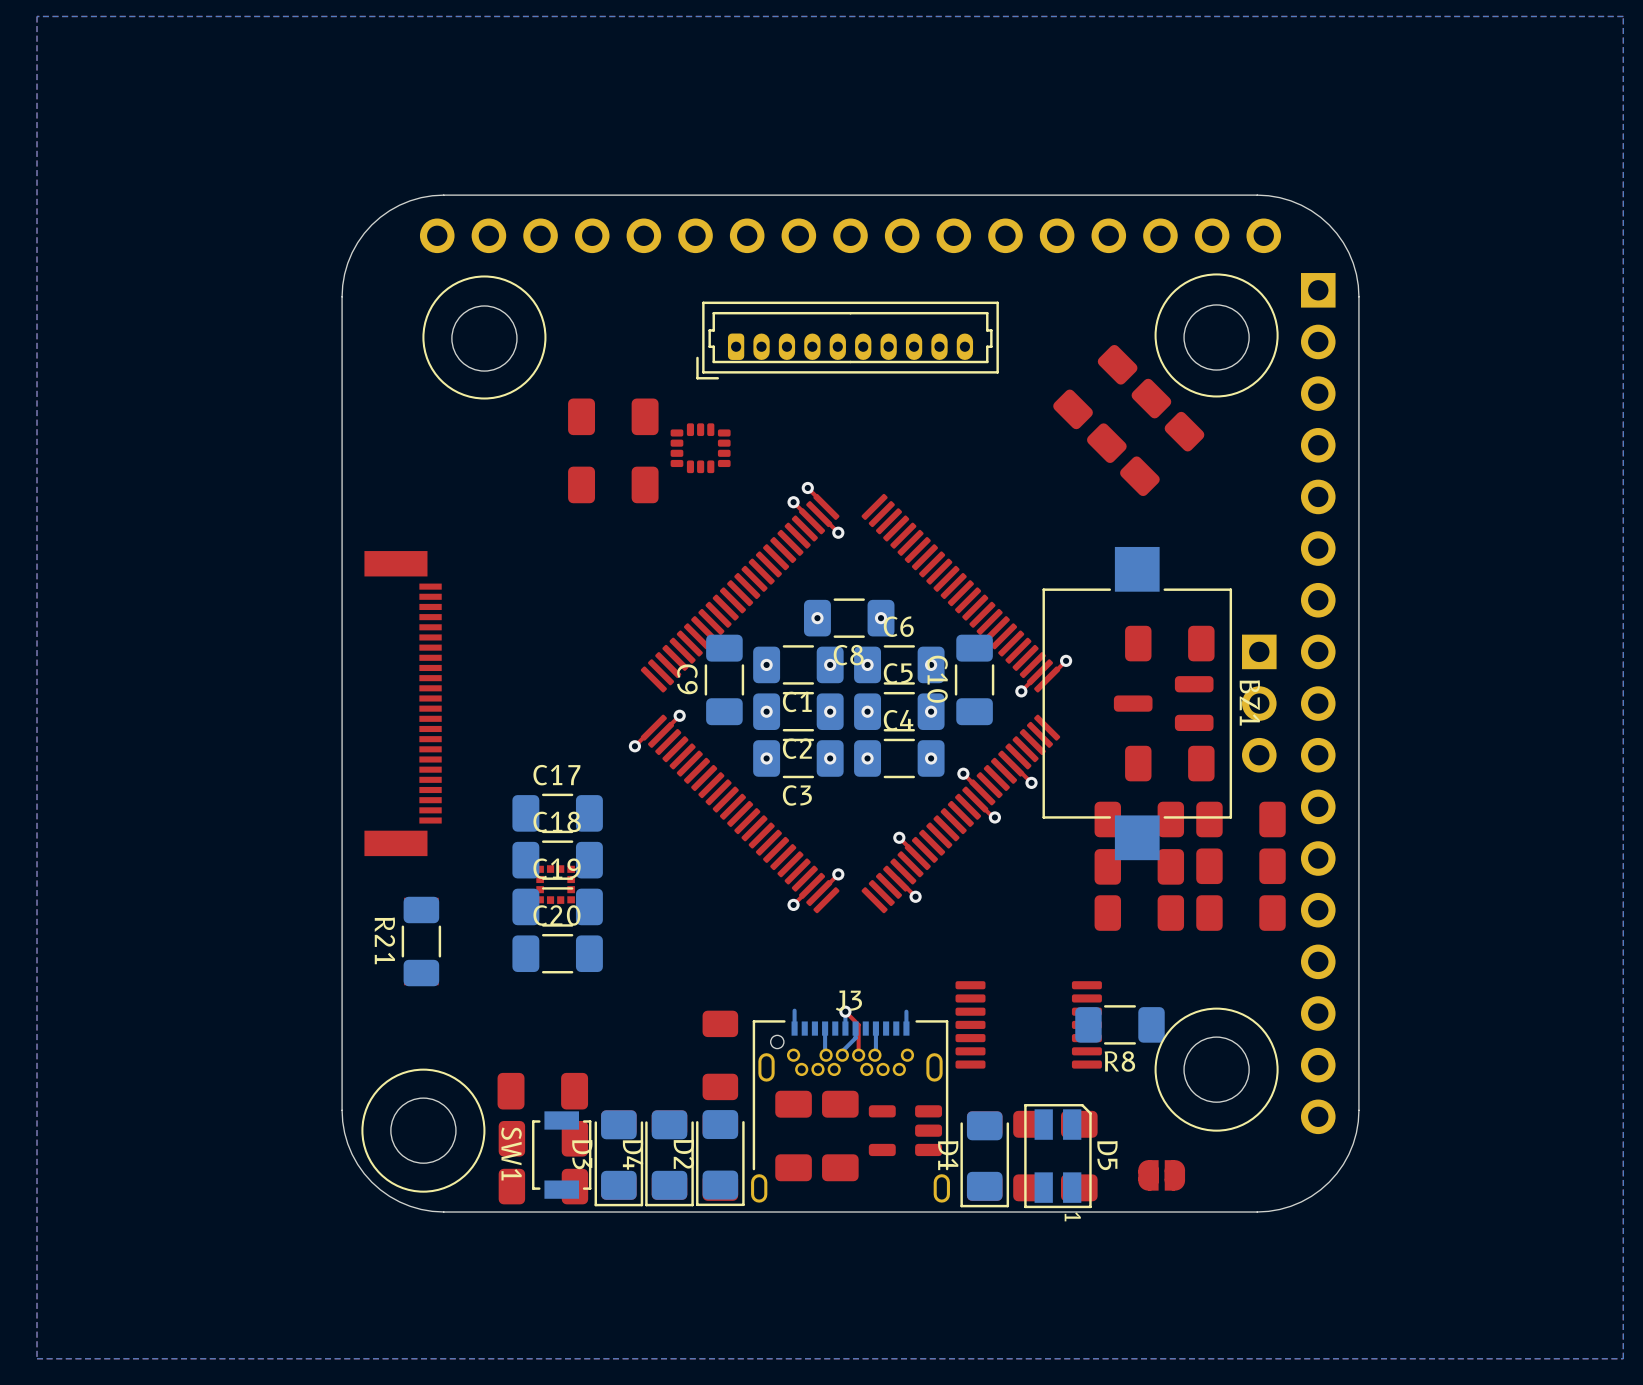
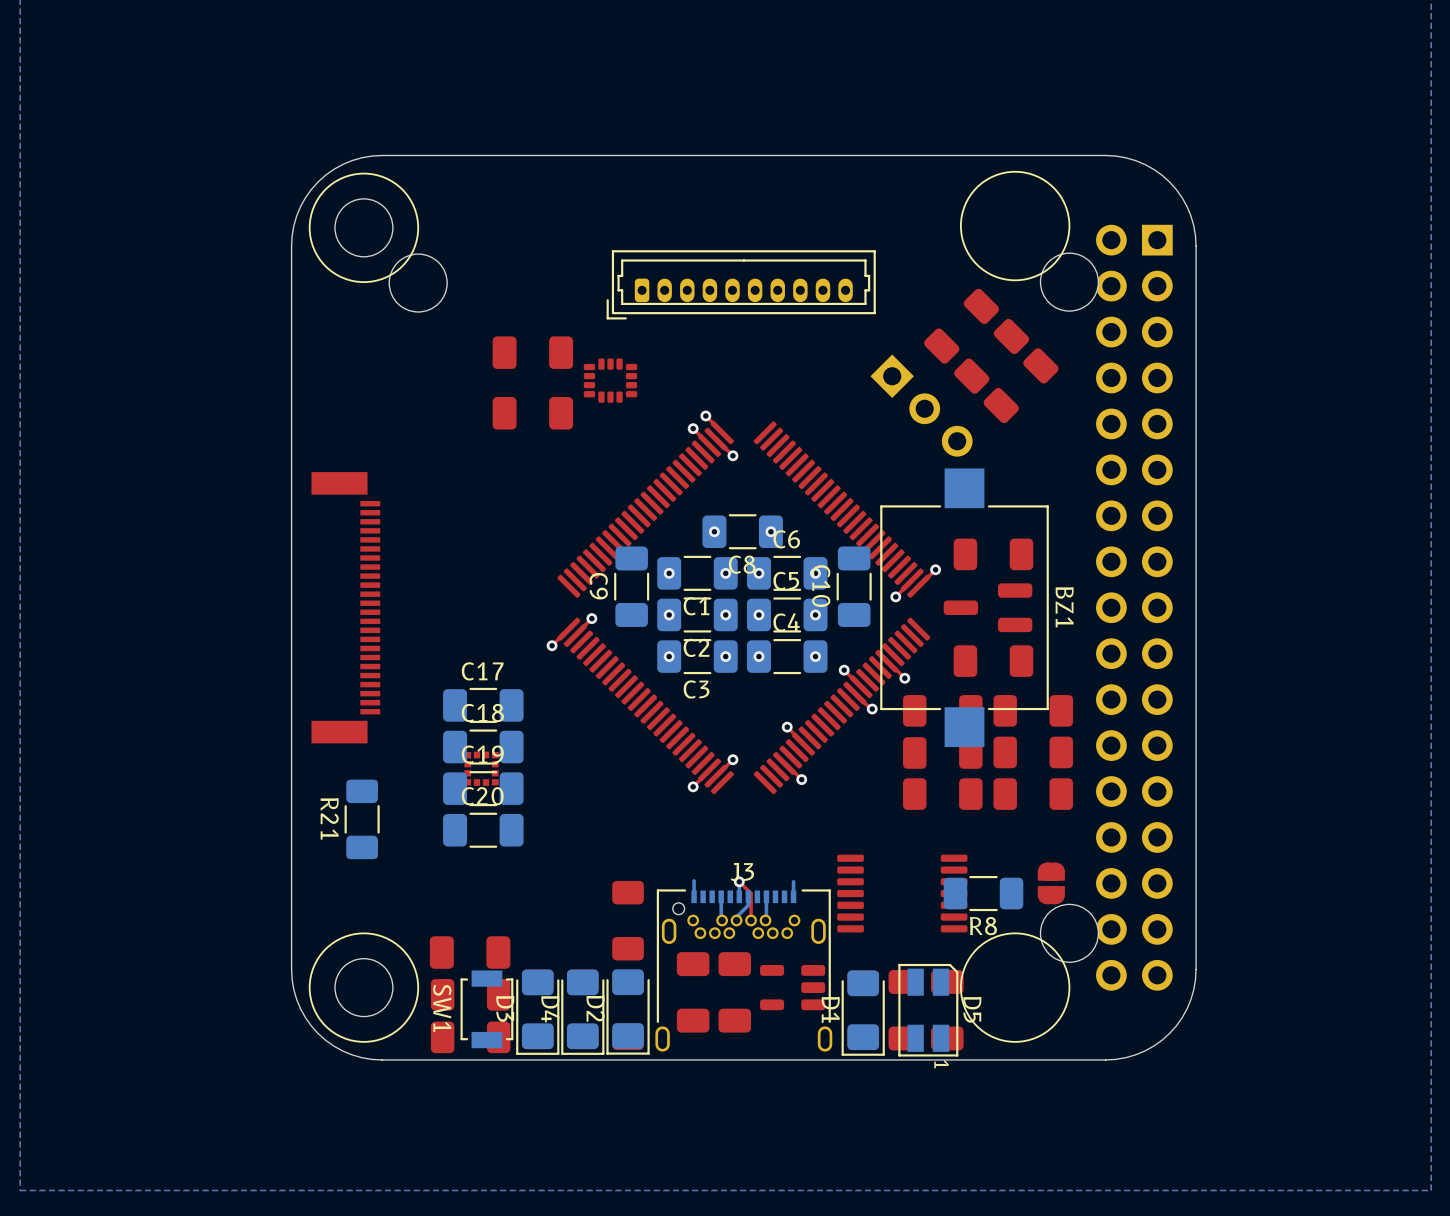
part footprint: [341, 194, 1360, 1213] -> [291, 155, 1197, 1061]
drawing: [422, 275, 547, 400] -> none
drawing position: (1216, 335) -> (1015, 226)
part: none -> (921, 405)
part position: (1169, 643) -> (993, 554)
BZ1 position: (1137, 703) -> (964, 607)
part position: (1163, 703) -> (988, 607)
part: (1259, 703) -> none
part: none -> (993, 661)
part: (1169, 763) -> none
part: none -> (942, 710)
part: (1139, 819) -> none
part: none -> (1033, 710)
part: (1240, 819) -> none
part: none -> (942, 752)
part: (1139, 866) -> none
part: none -> (1033, 752)
part: (1240, 866) -> none
part: none -> (942, 794)
part: (1139, 913) -> none
part: none -> (1033, 794)
part: (1240, 913) -> none
drawing position: (1216, 1069) -> (1015, 987)
part rotation: 0° (1161, 1175) -> 90° clockwise (1051, 883)
part position: (1161, 1175) -> (1051, 883)

